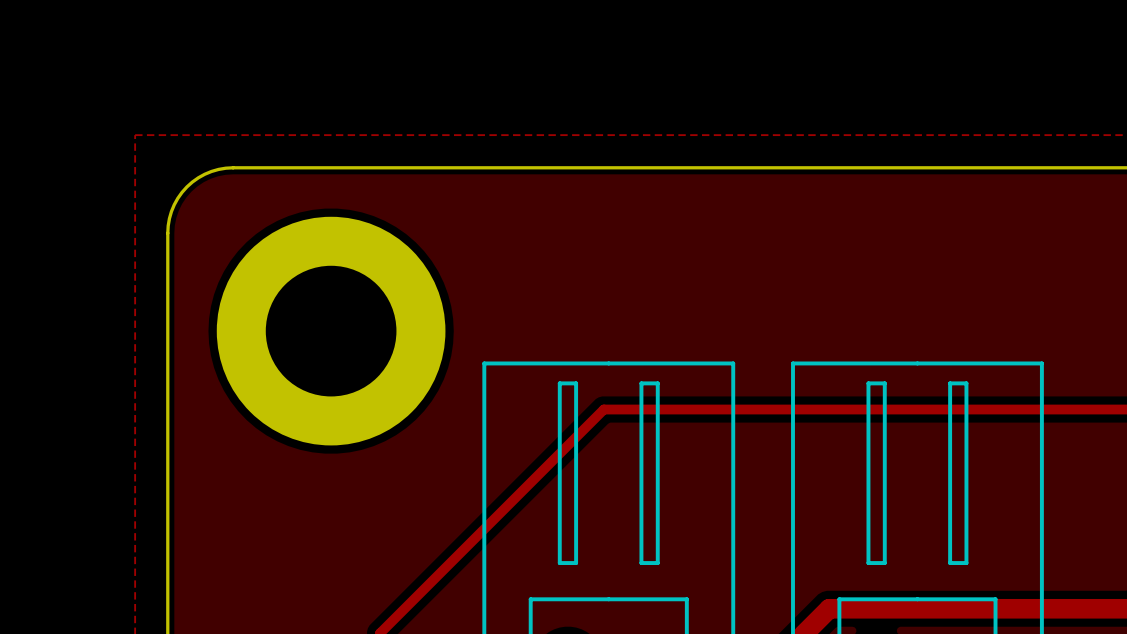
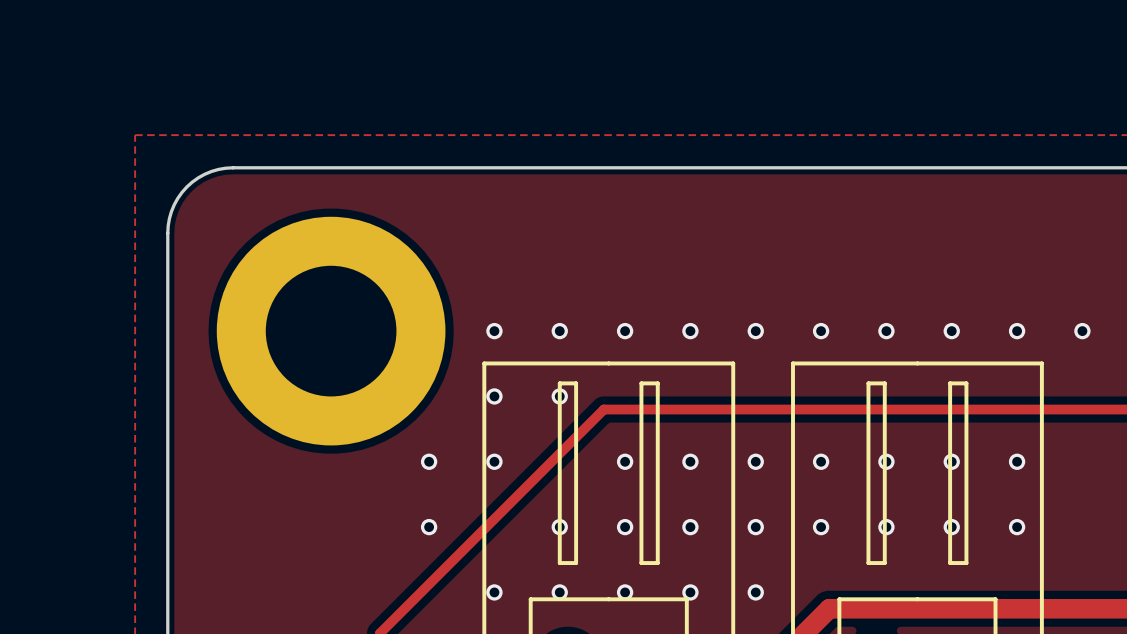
via: none -> (494, 331)
via: none -> (559, 331)
via: none -> (625, 331)
via: none -> (690, 331)
via: none -> (755, 331)
via: none -> (821, 331)
via: none -> (886, 331)
via: none -> (951, 331)
via: none -> (1017, 331)
via: none -> (1082, 331)
via: none -> (494, 396)
via: none -> (559, 396)
via: none -> (429, 461)
via: none -> (494, 461)
via: none -> (625, 461)
via: none -> (690, 461)
via: none -> (755, 461)
via: none -> (821, 461)
via: none -> (886, 461)
via: none -> (951, 461)
via: none -> (1017, 461)
via: none -> (429, 527)
via: none -> (559, 527)
via: none -> (625, 527)
via: none -> (690, 527)
via: none -> (755, 527)
via: none -> (821, 527)
via: none -> (886, 527)
via: none -> (951, 527)
via: none -> (1017, 527)
via: none -> (494, 592)
via: none -> (559, 592)
via: none -> (625, 592)
via: none -> (690, 592)
via: none -> (755, 592)

